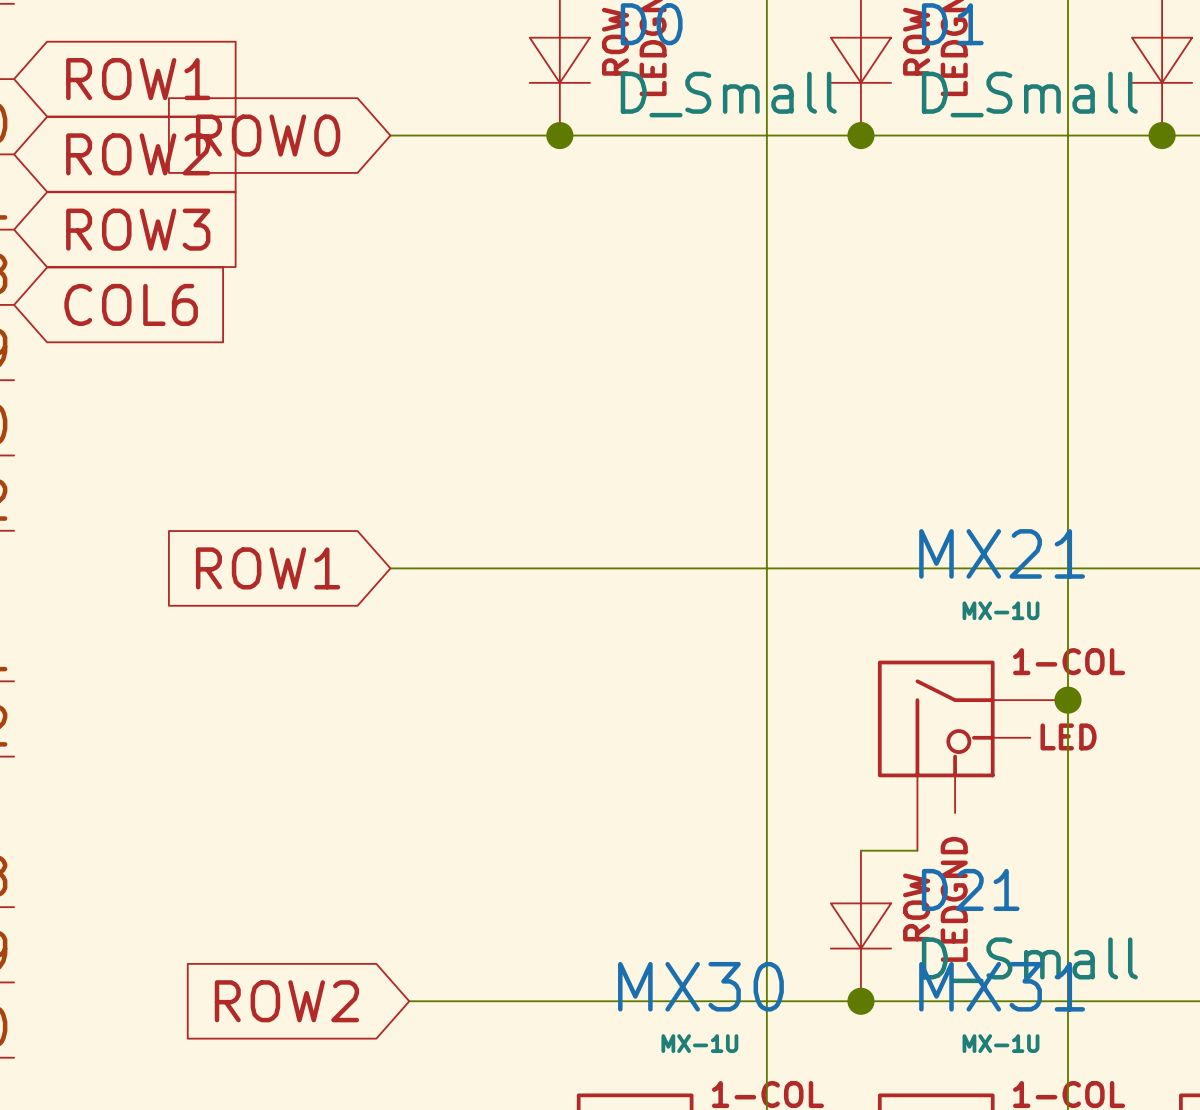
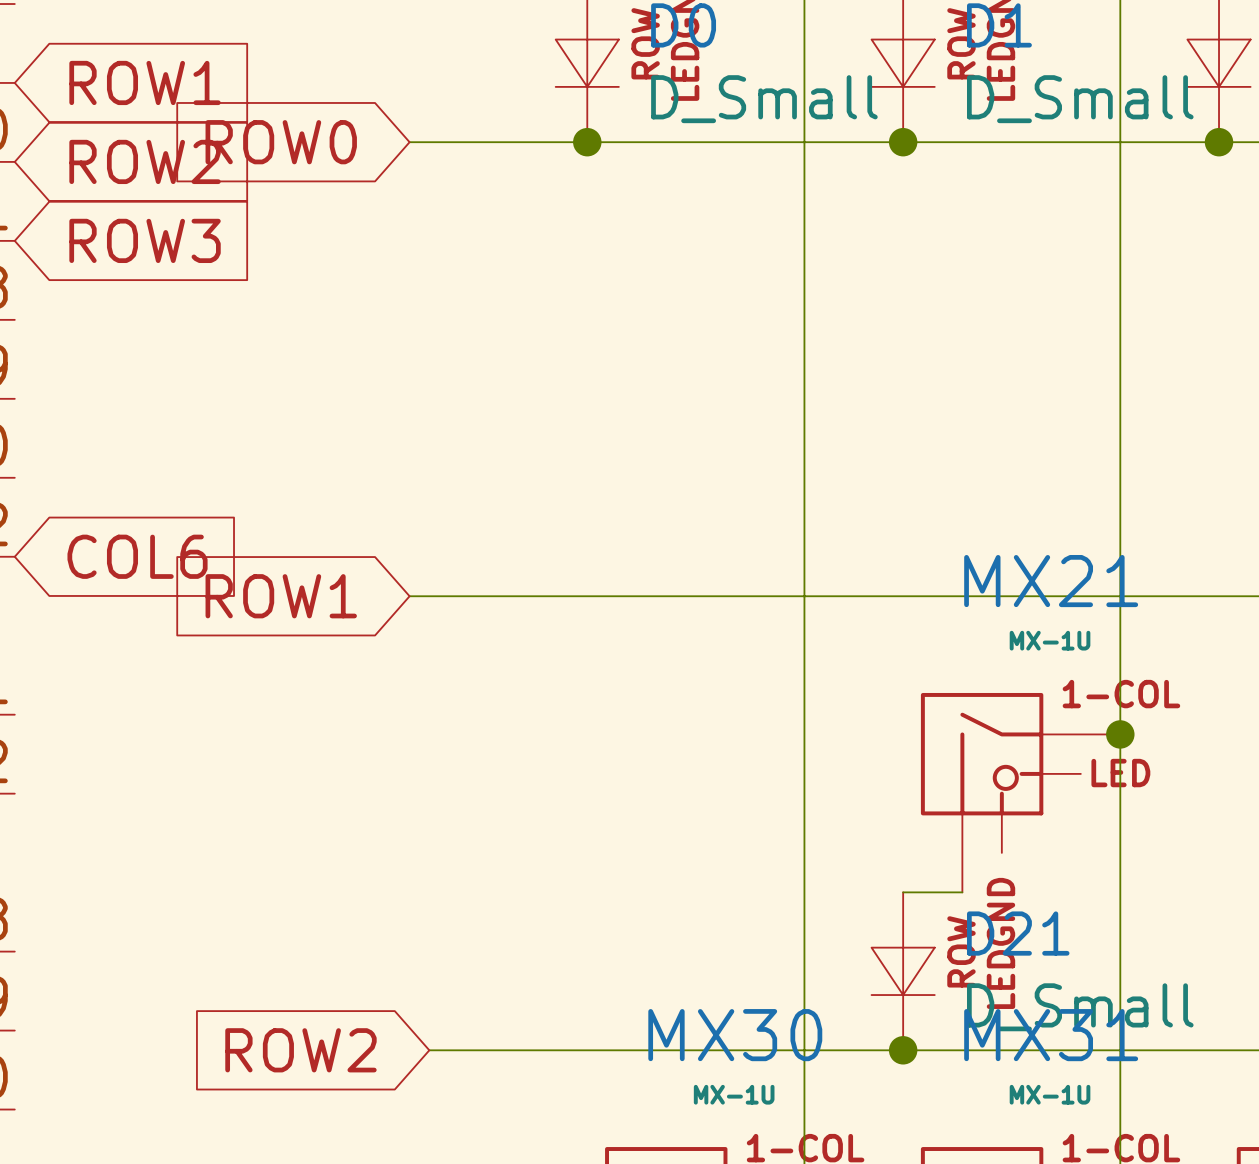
global label position: COL6 (131, 304) -> COL6 (137, 556)

